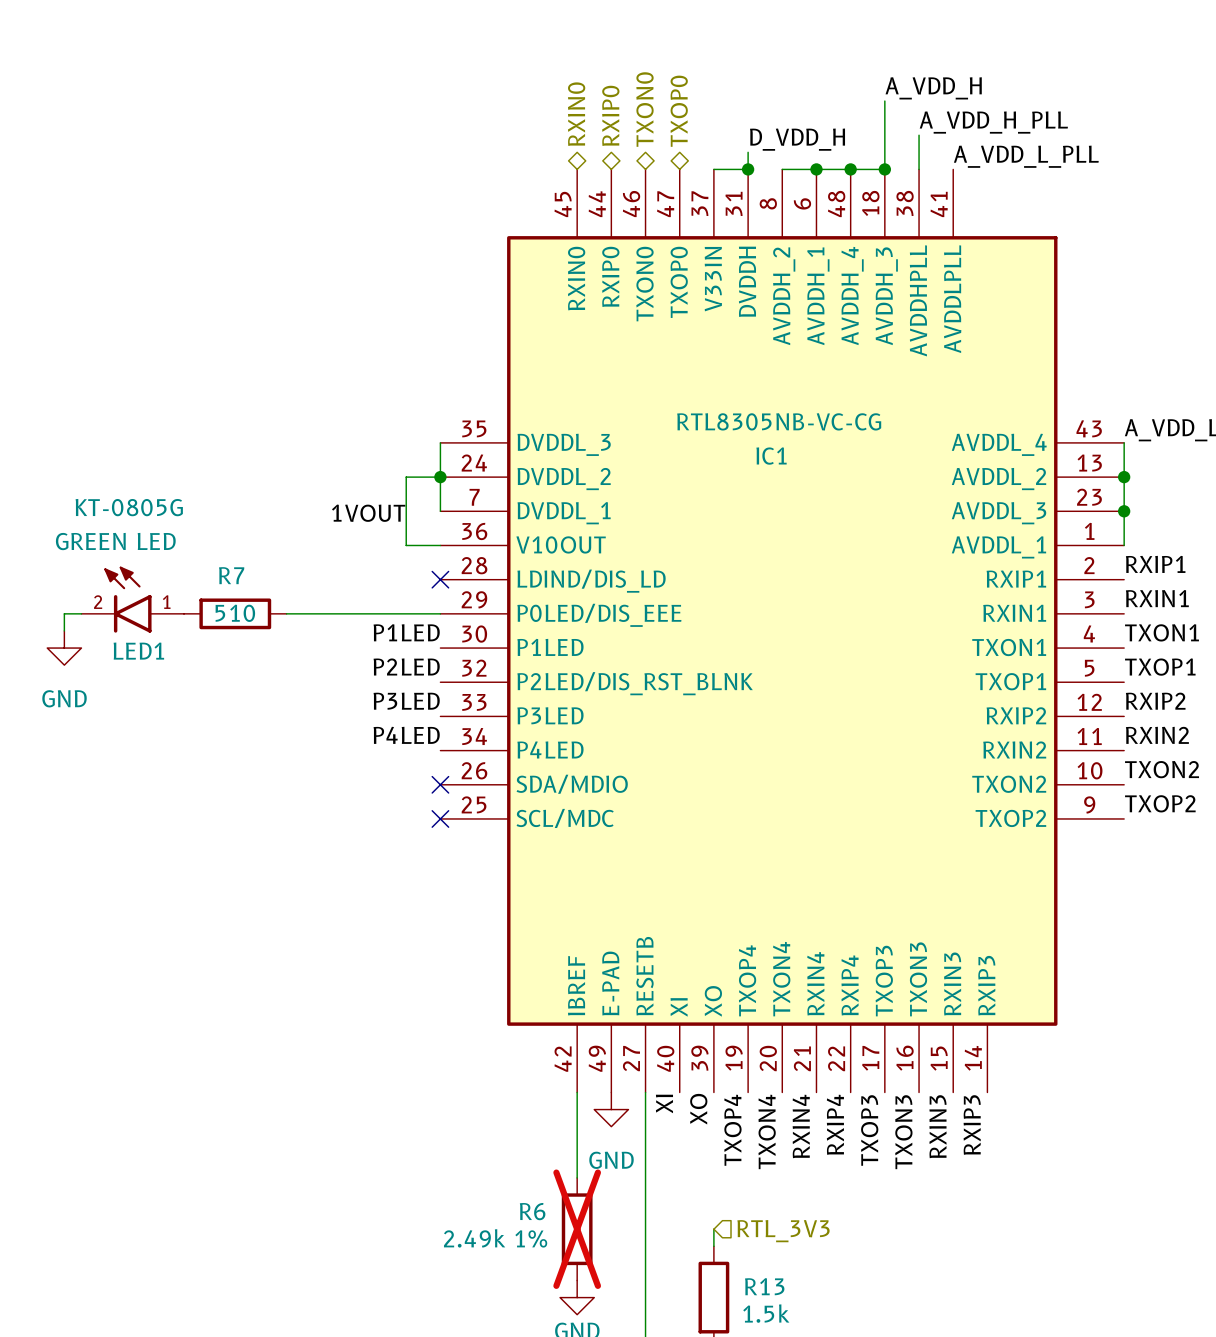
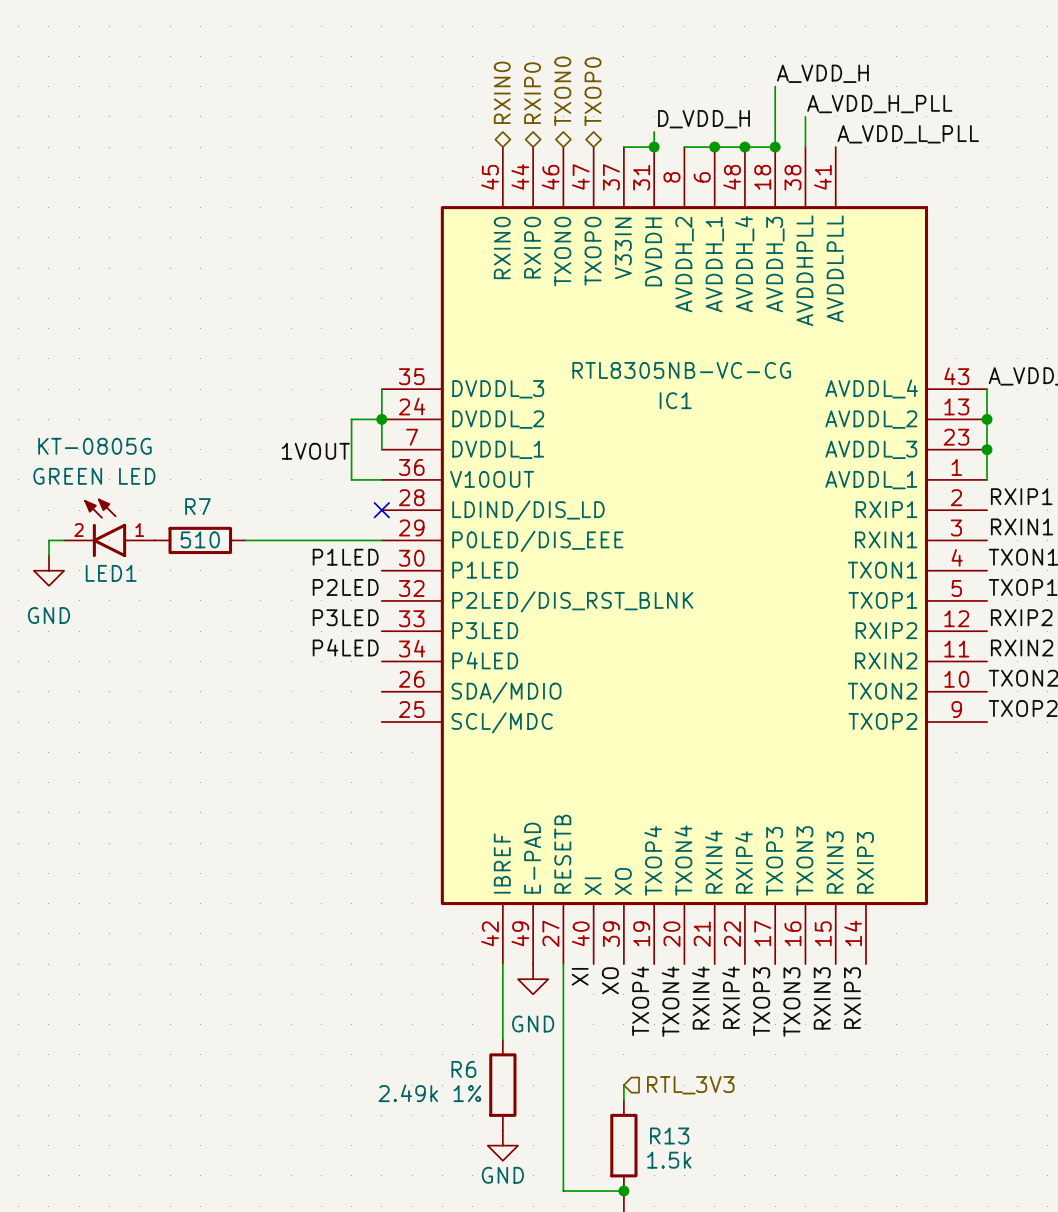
no-connect mark: (440, 784) -> none
no-connect mark: (440, 818) -> none
R6 do-not-place cross: (577, 1229) -> none

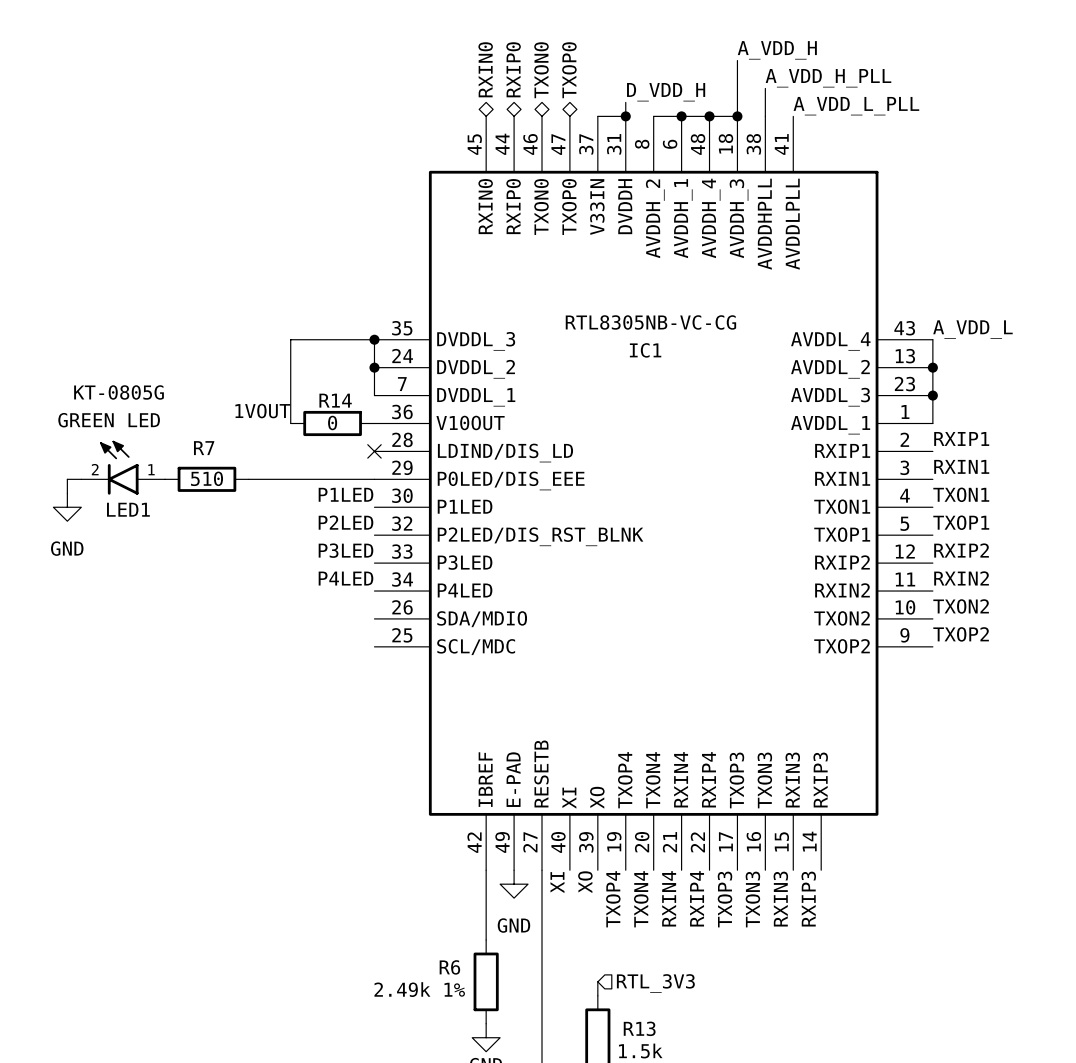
wire: none -> (374, 339) (290, 339) (290, 423)
junction: none -> (374, 339)
wire: (381, 419) (351, 419) (351, 479) (381, 479) -> none
label position: 1VOUT (315, 451) -> 1VOUT (262, 411)
R14: none -> 0 (332, 423)

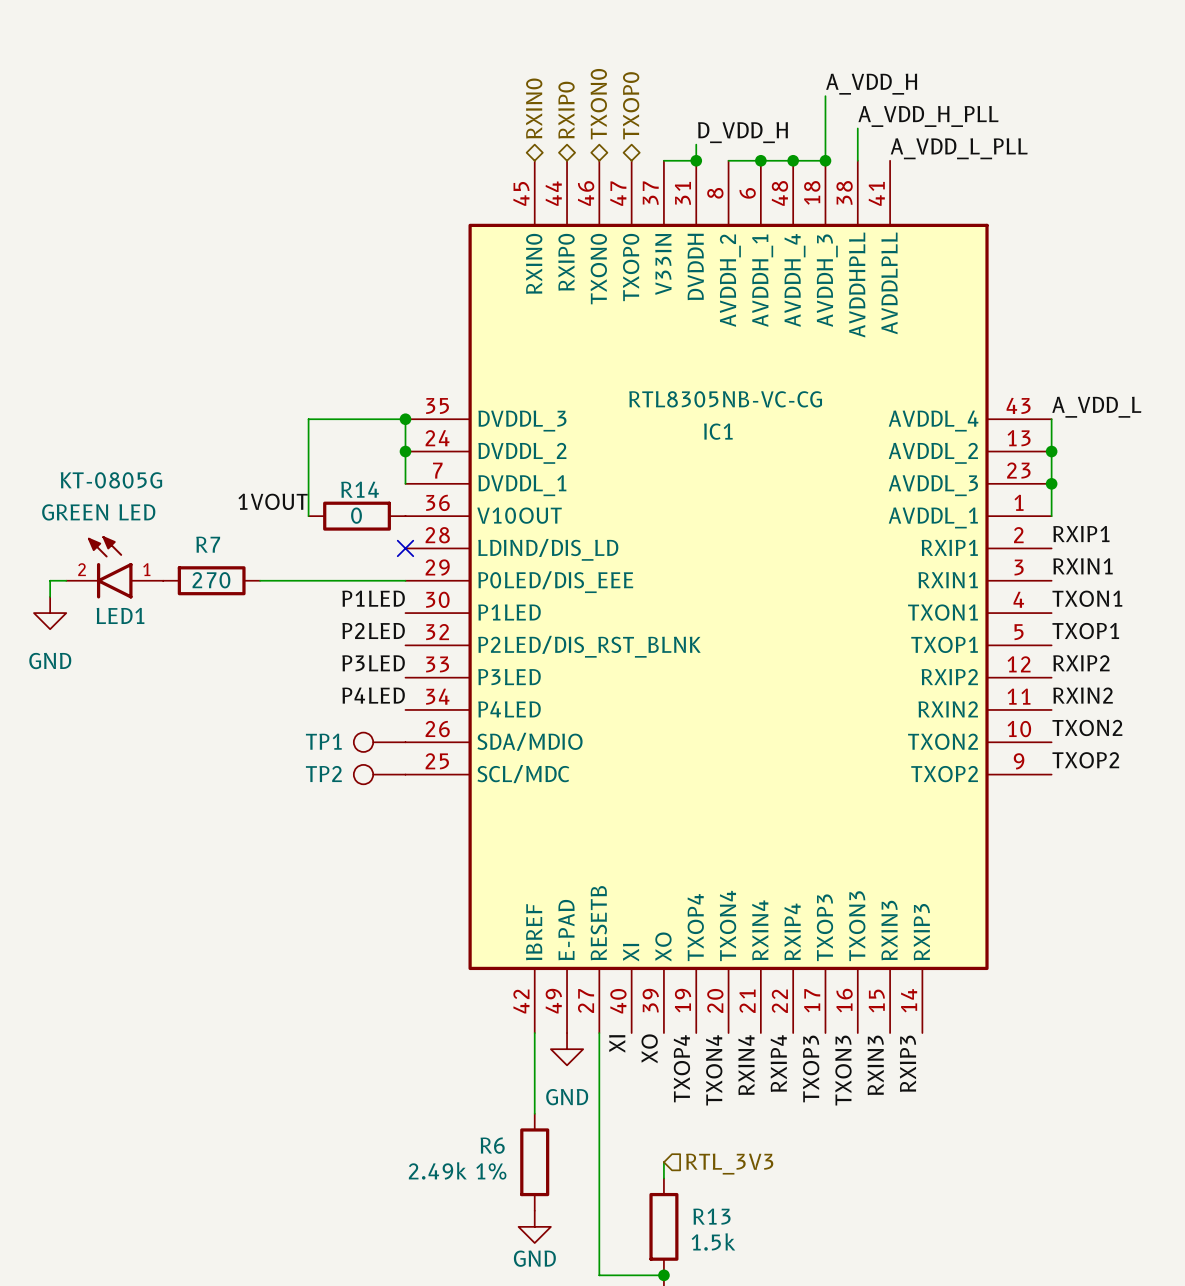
R7 value: 510 (207, 478) -> 270 (211, 580)
TP1: none -> (379, 742)
TP2: none -> (379, 774)

